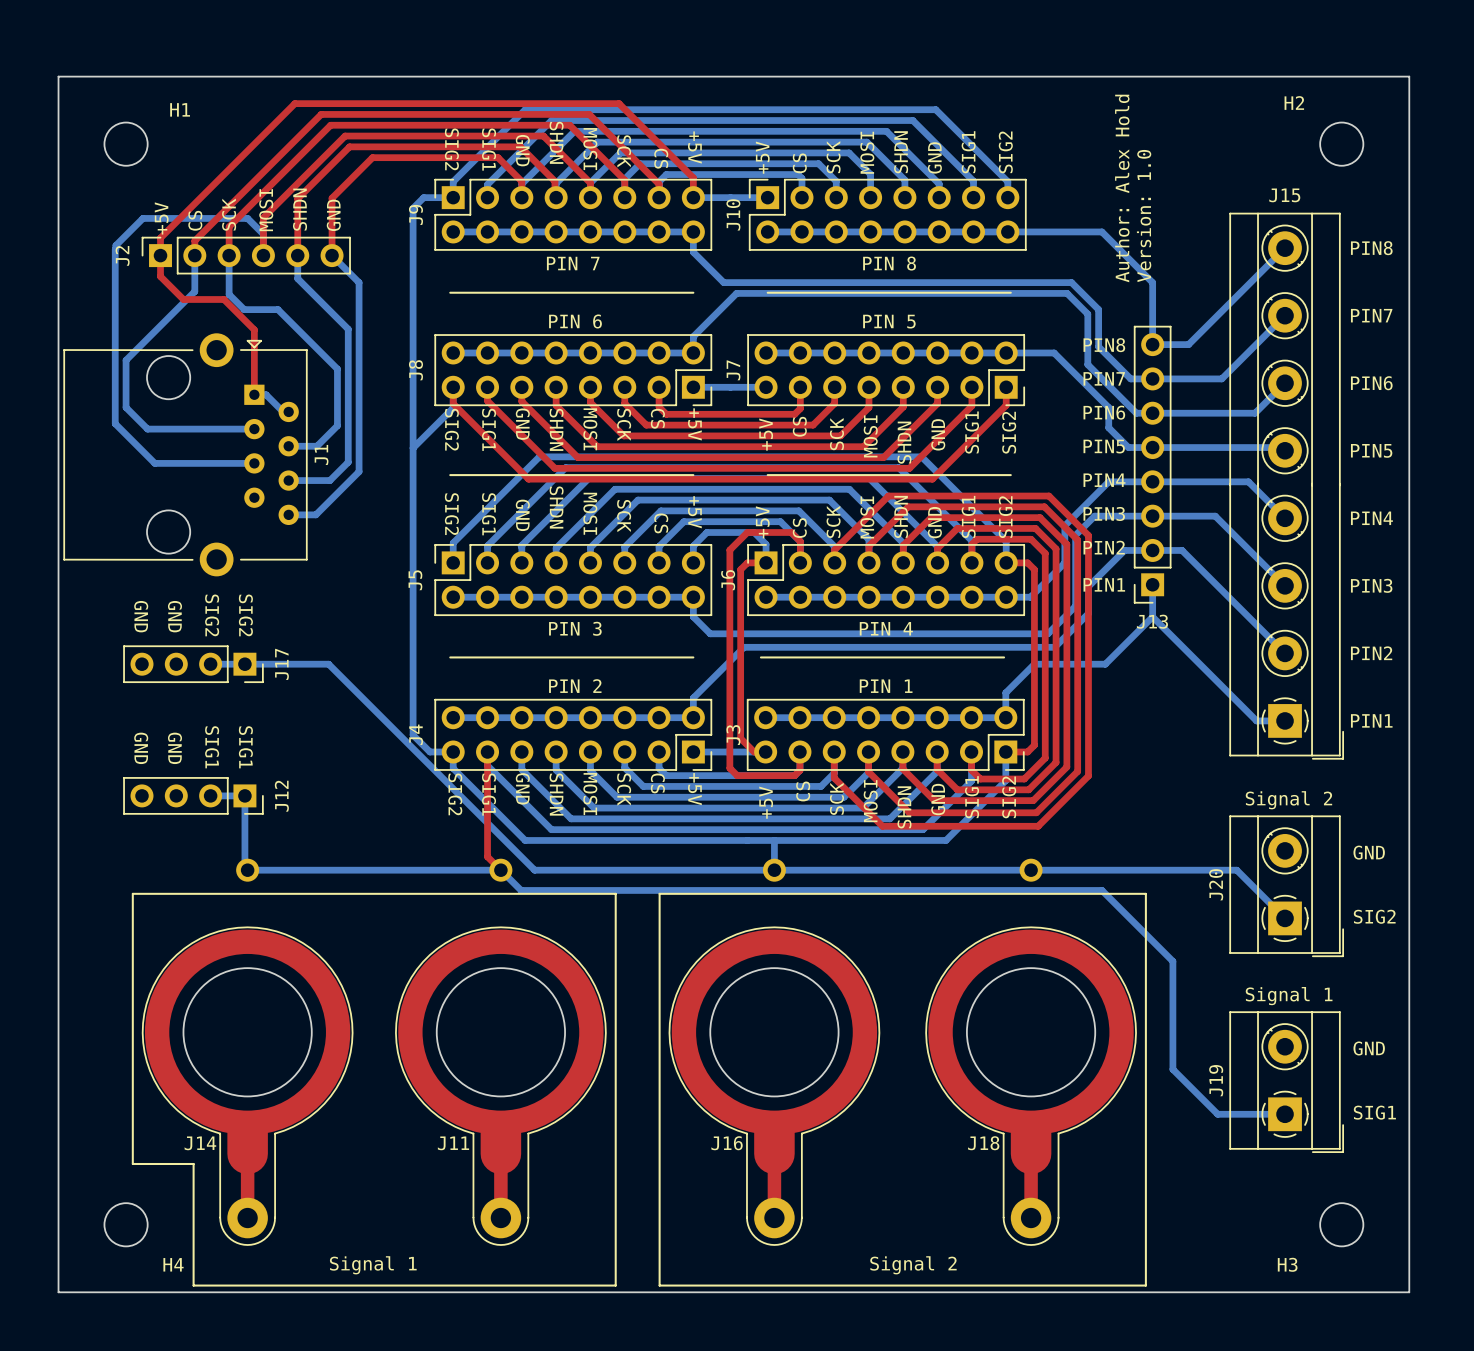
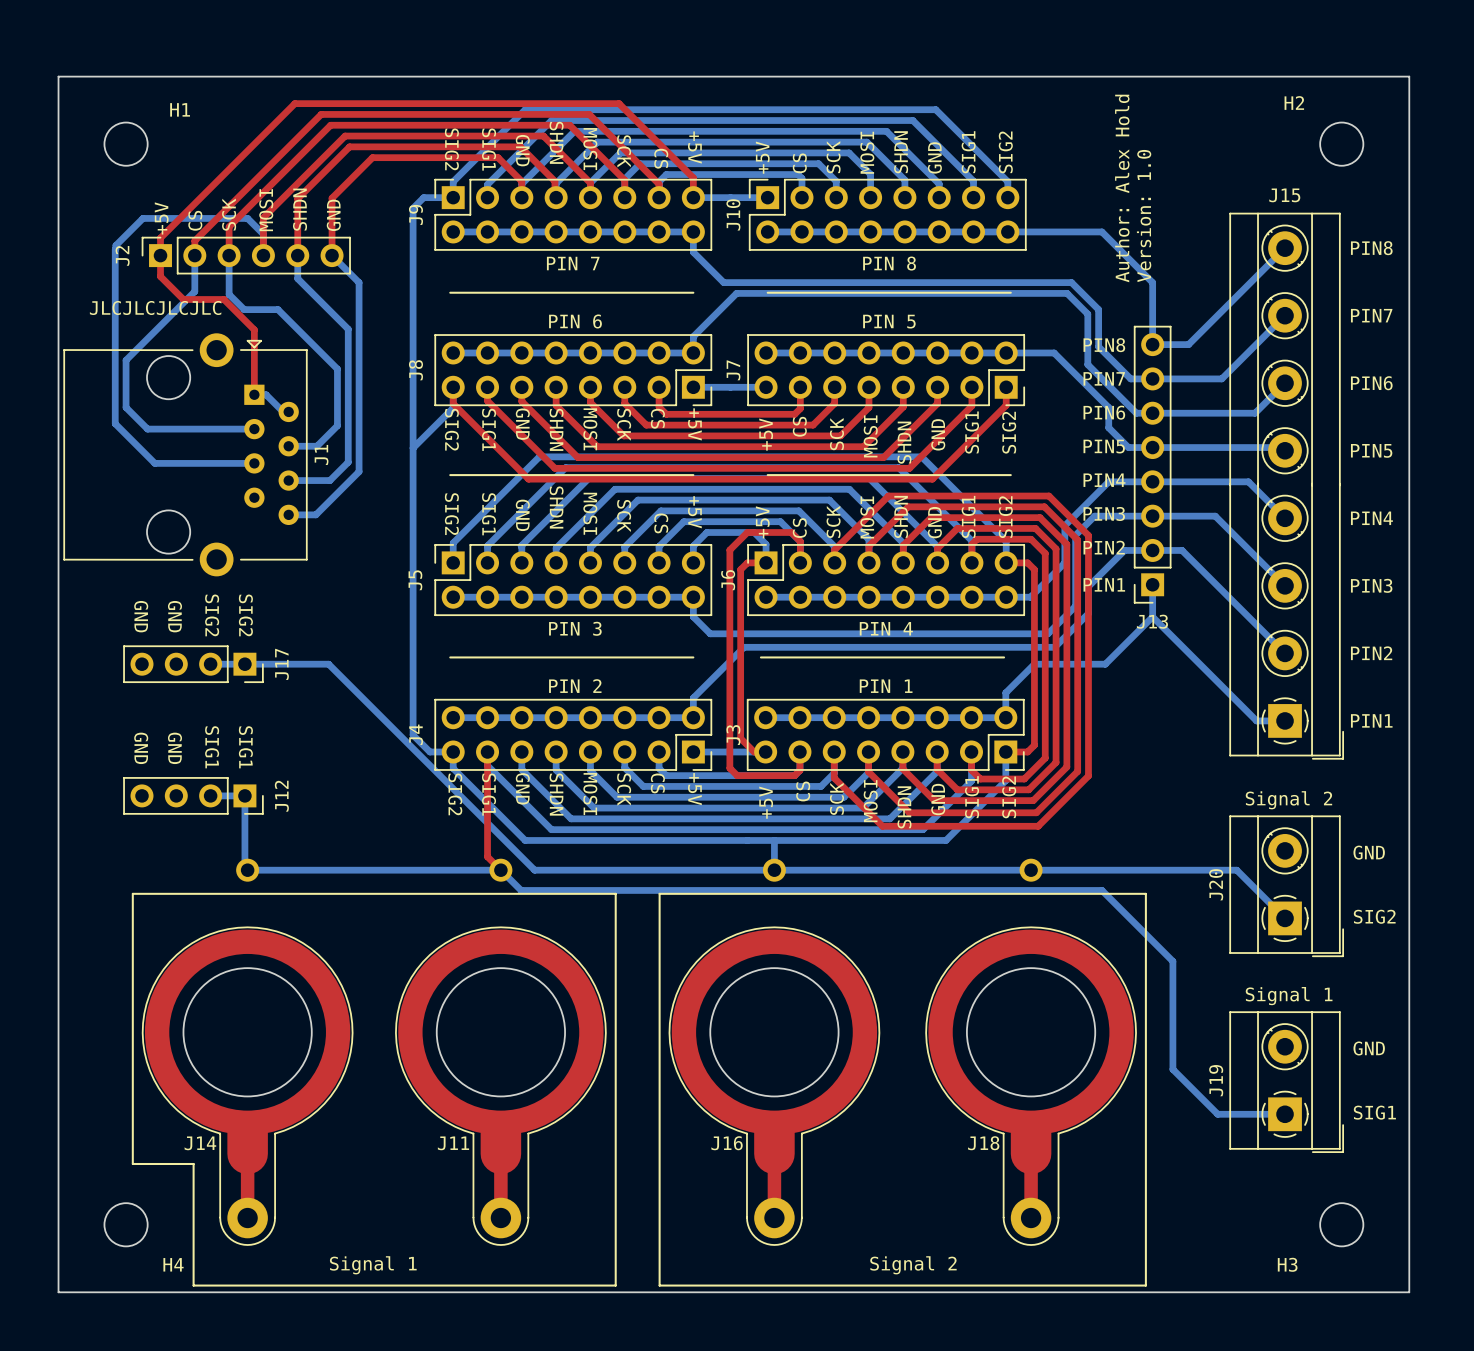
text: none -> JLCJLCJLCJLC (155, 307)

